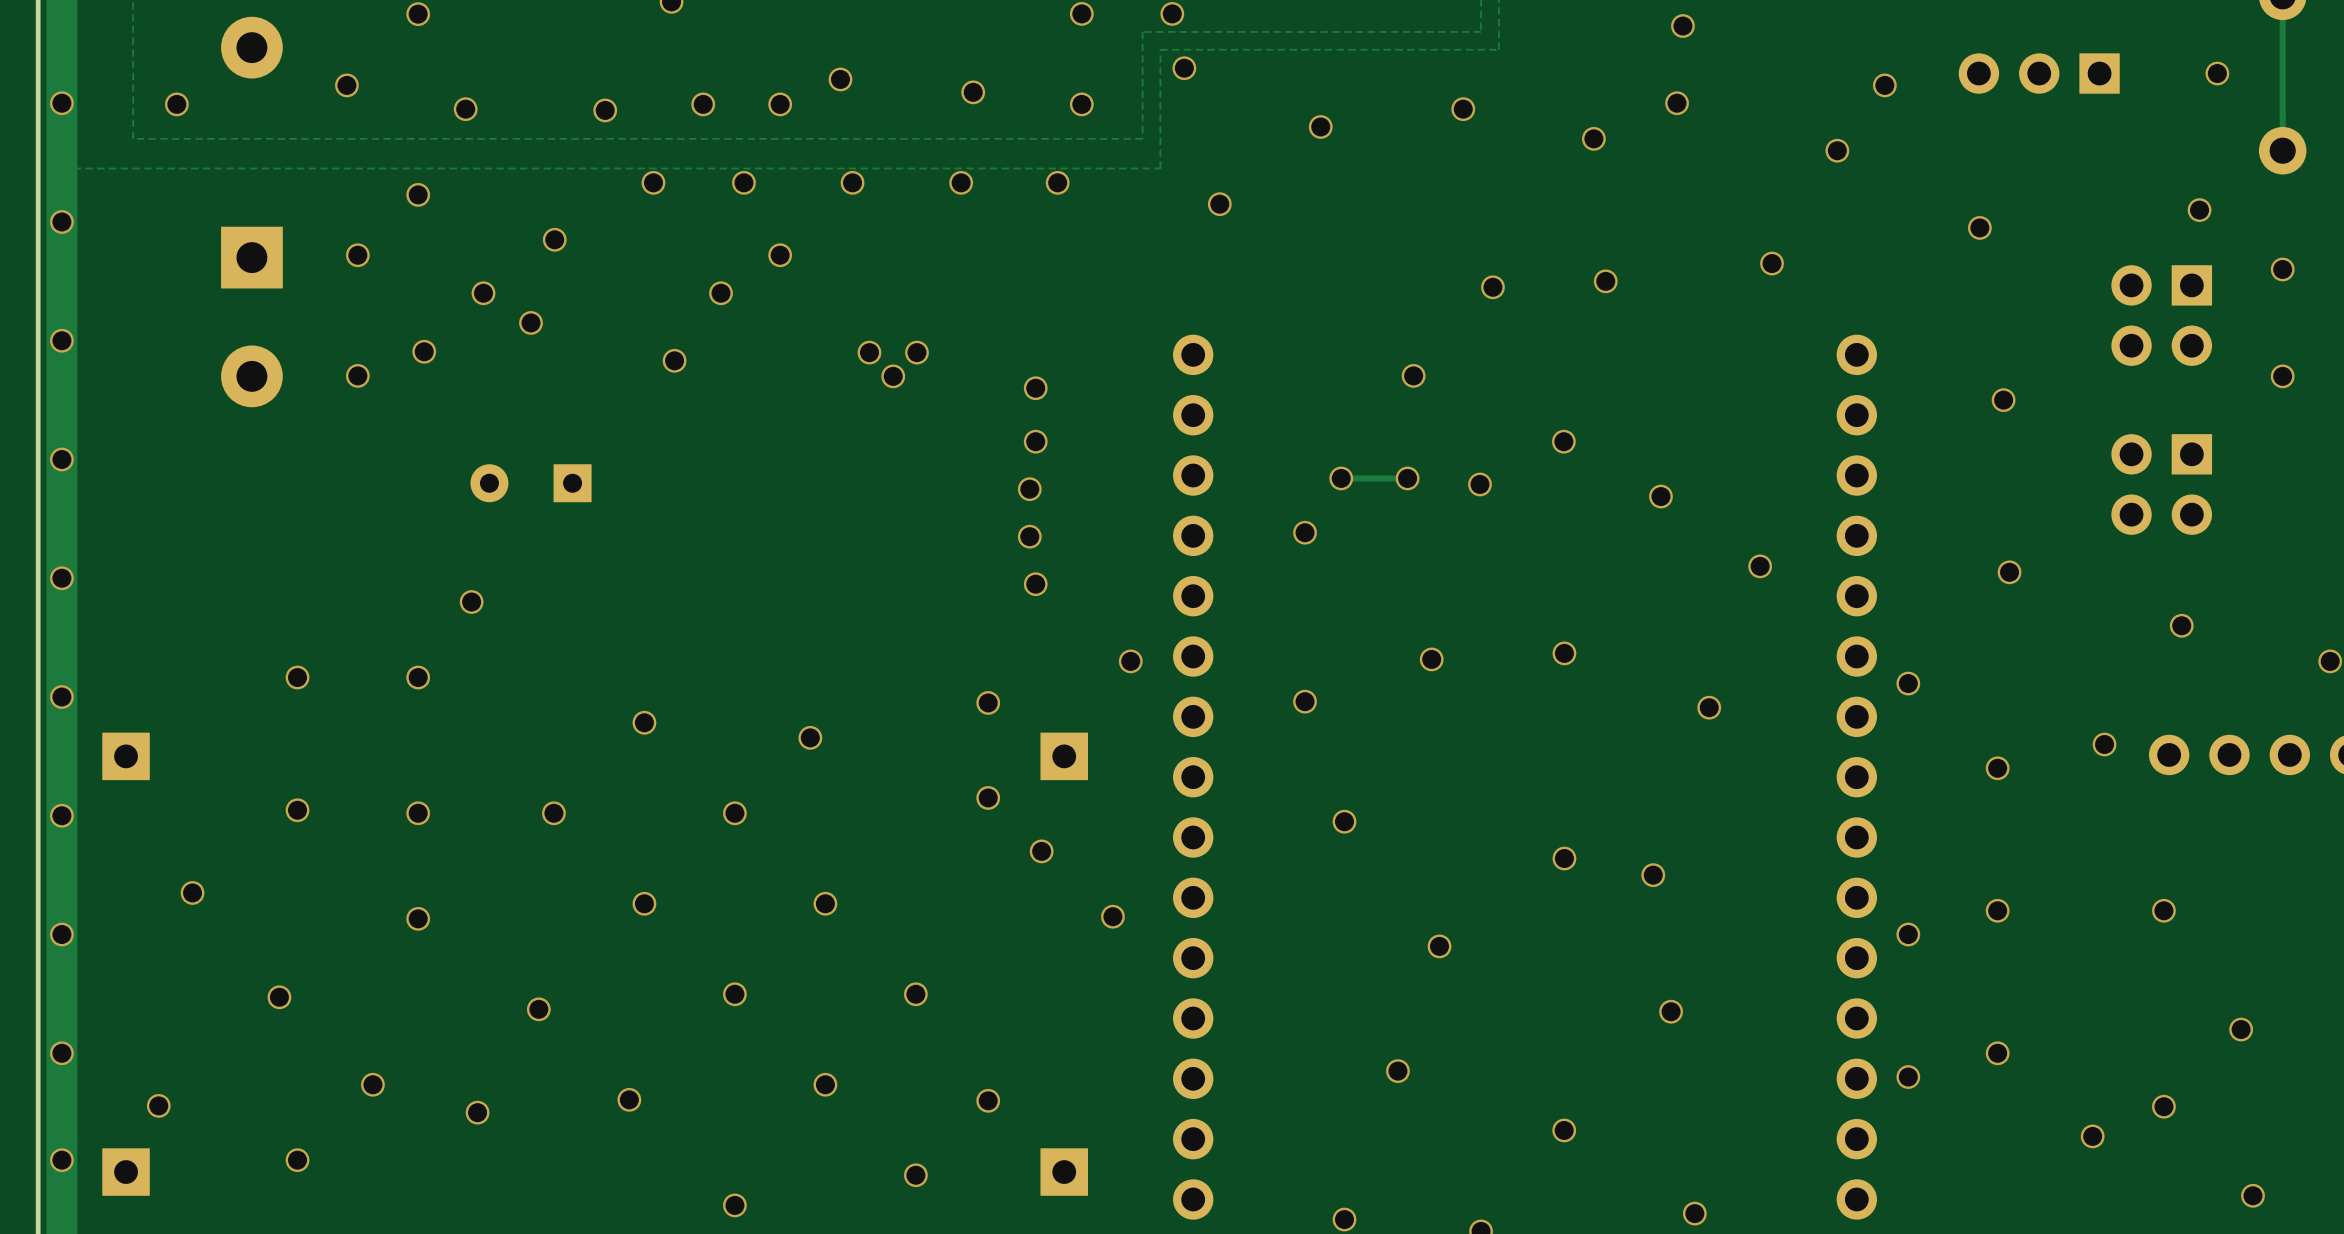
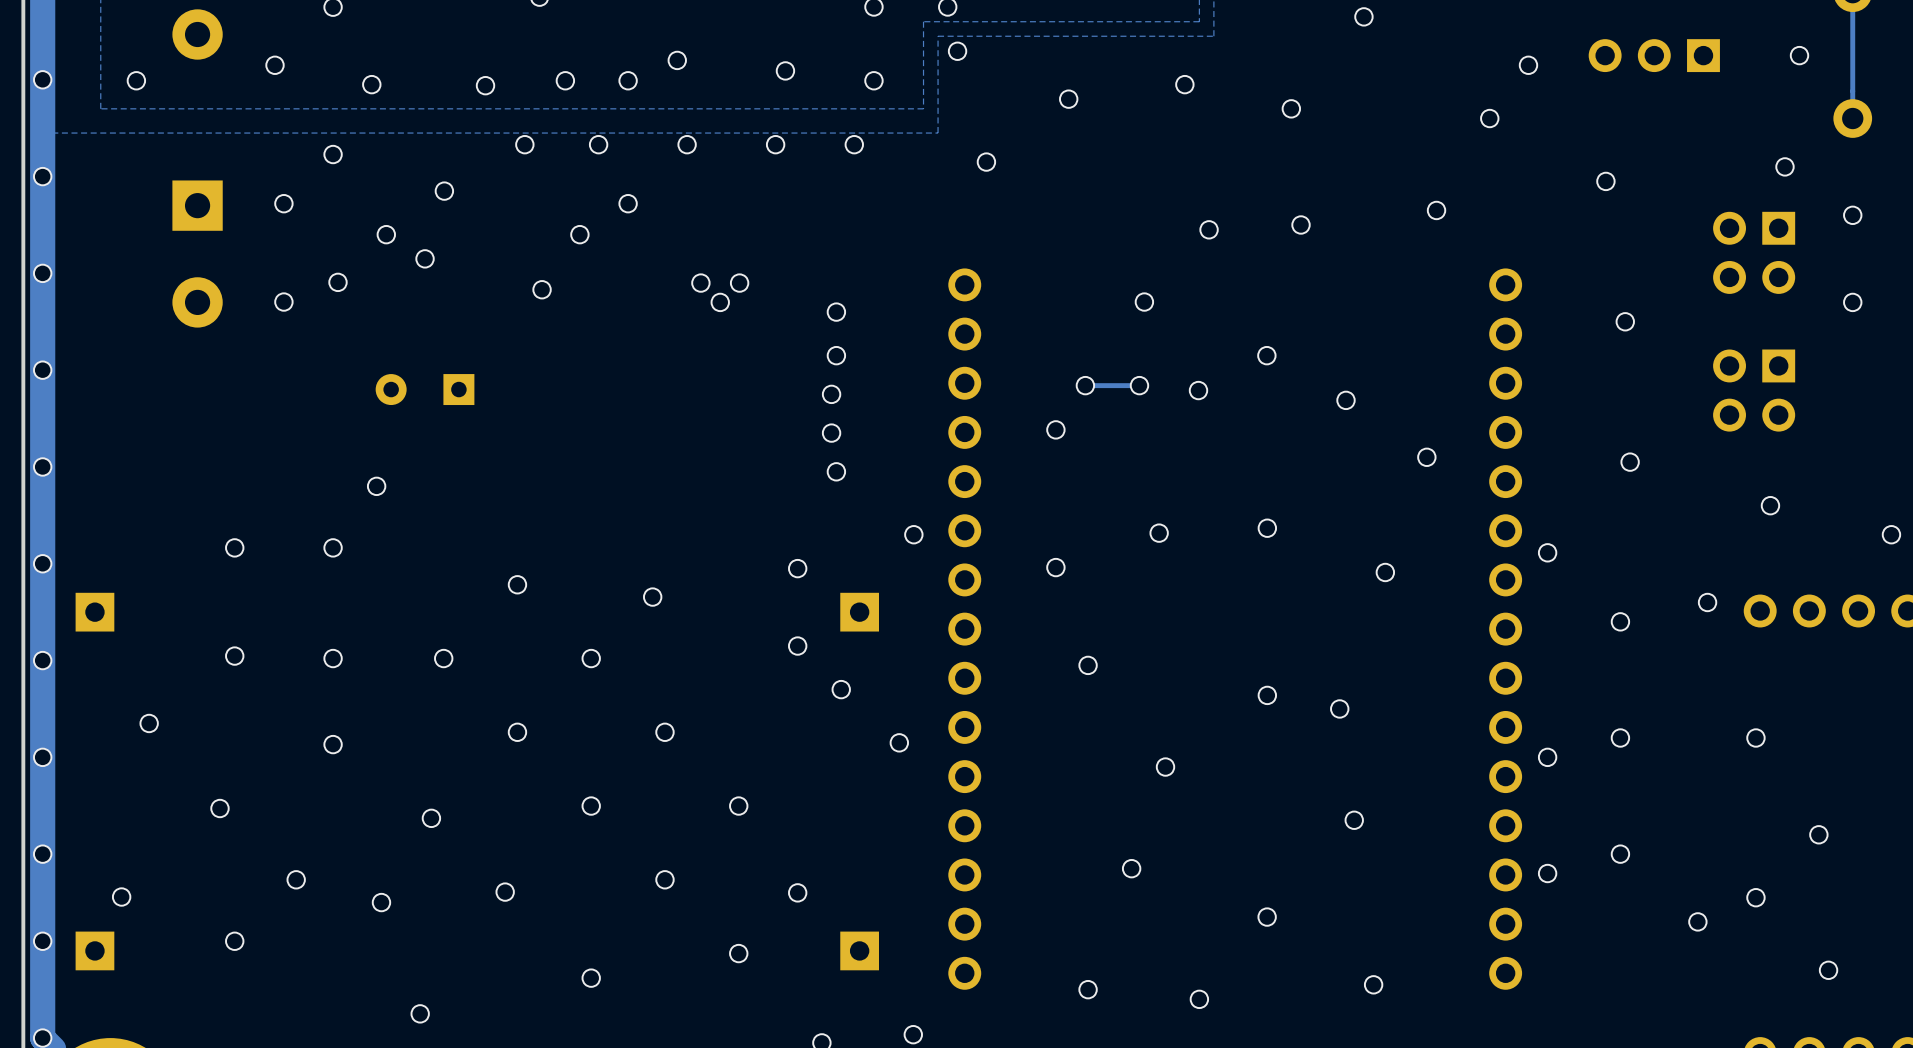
via: (1677, 103) -> none

